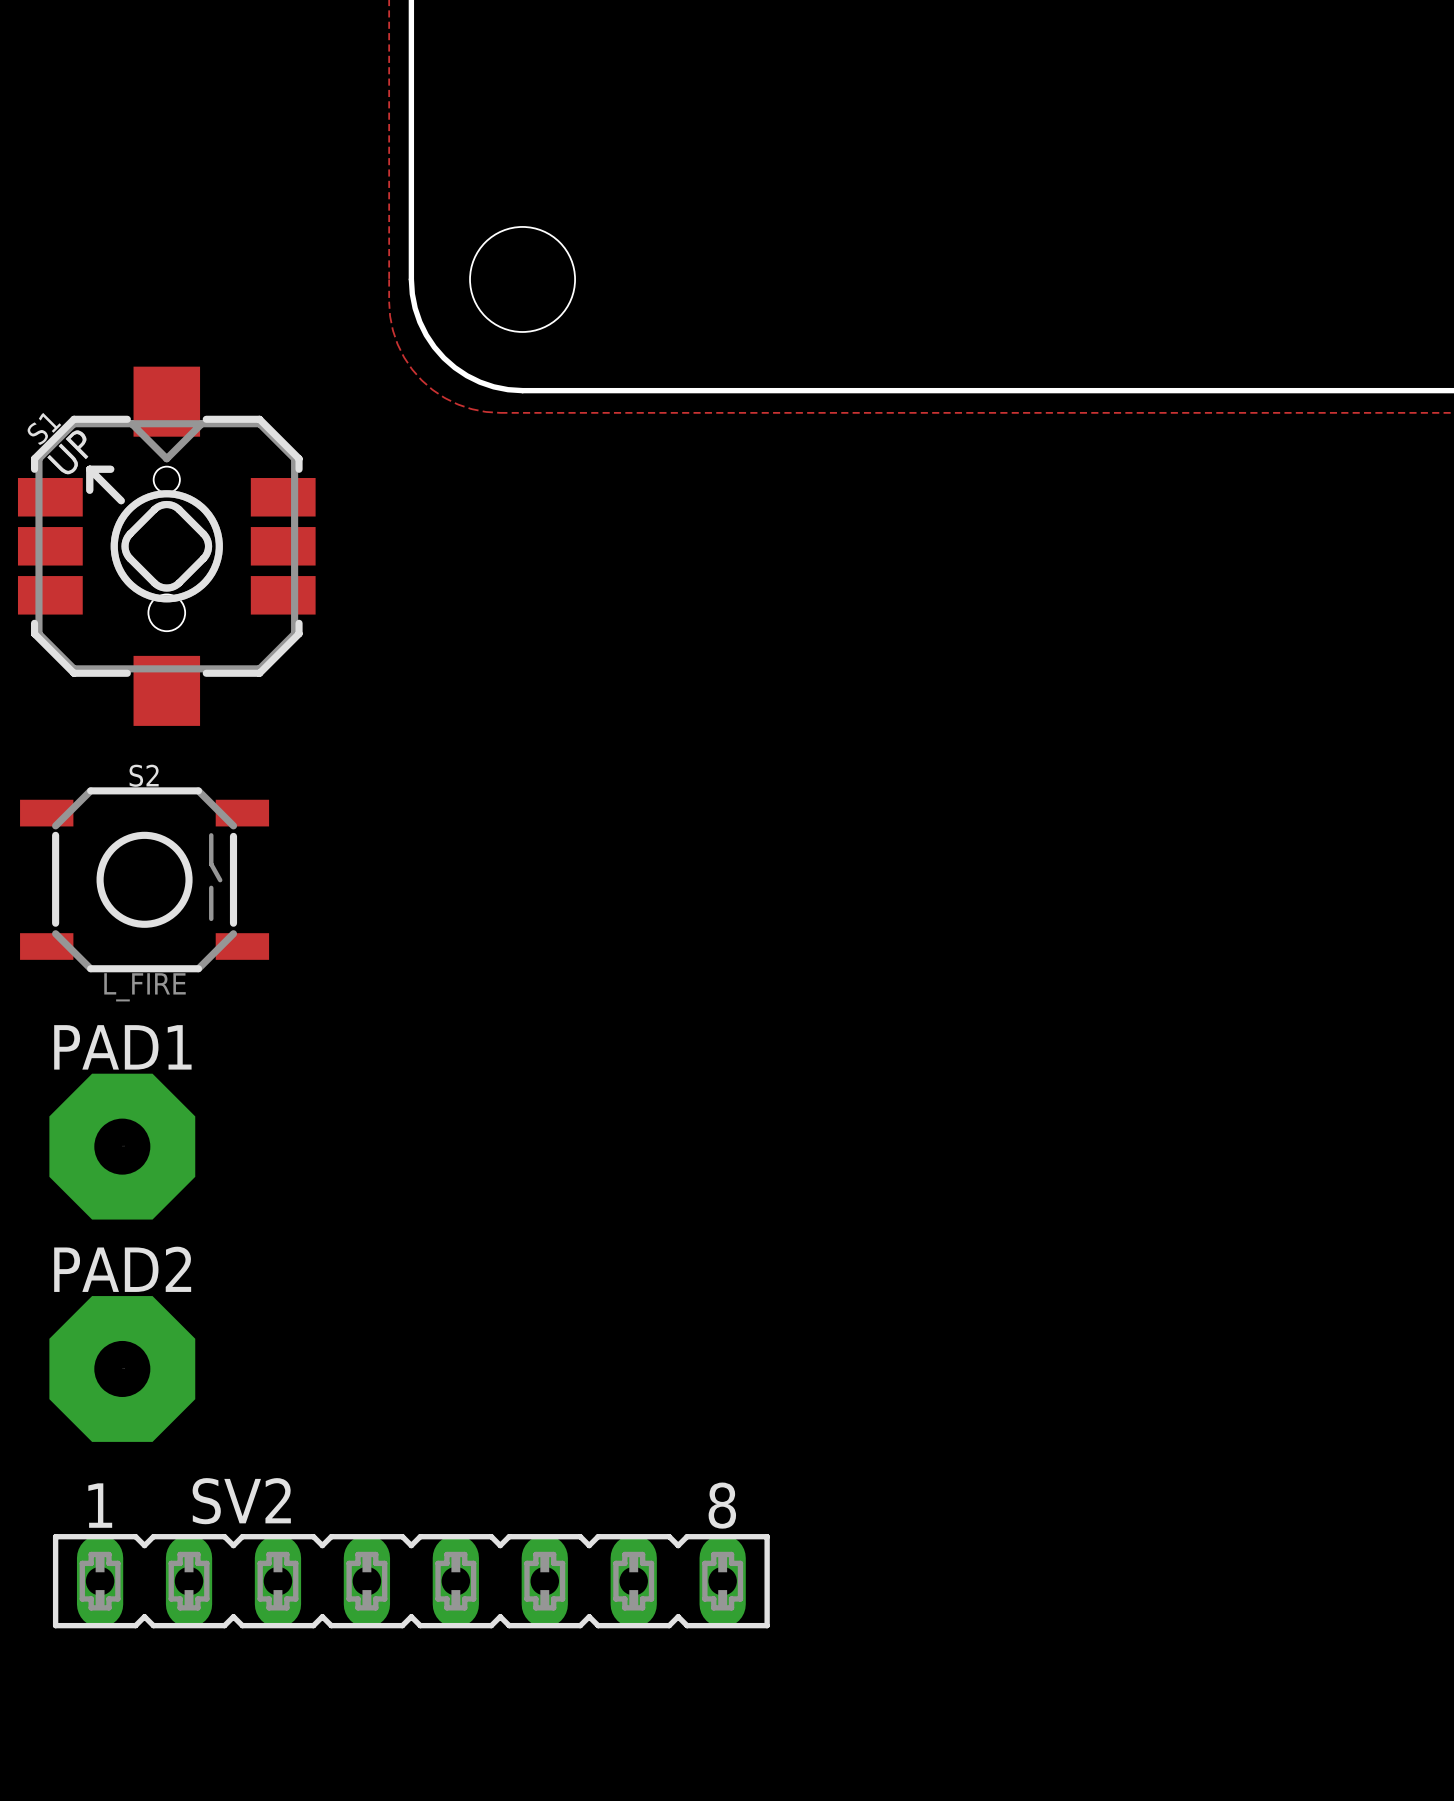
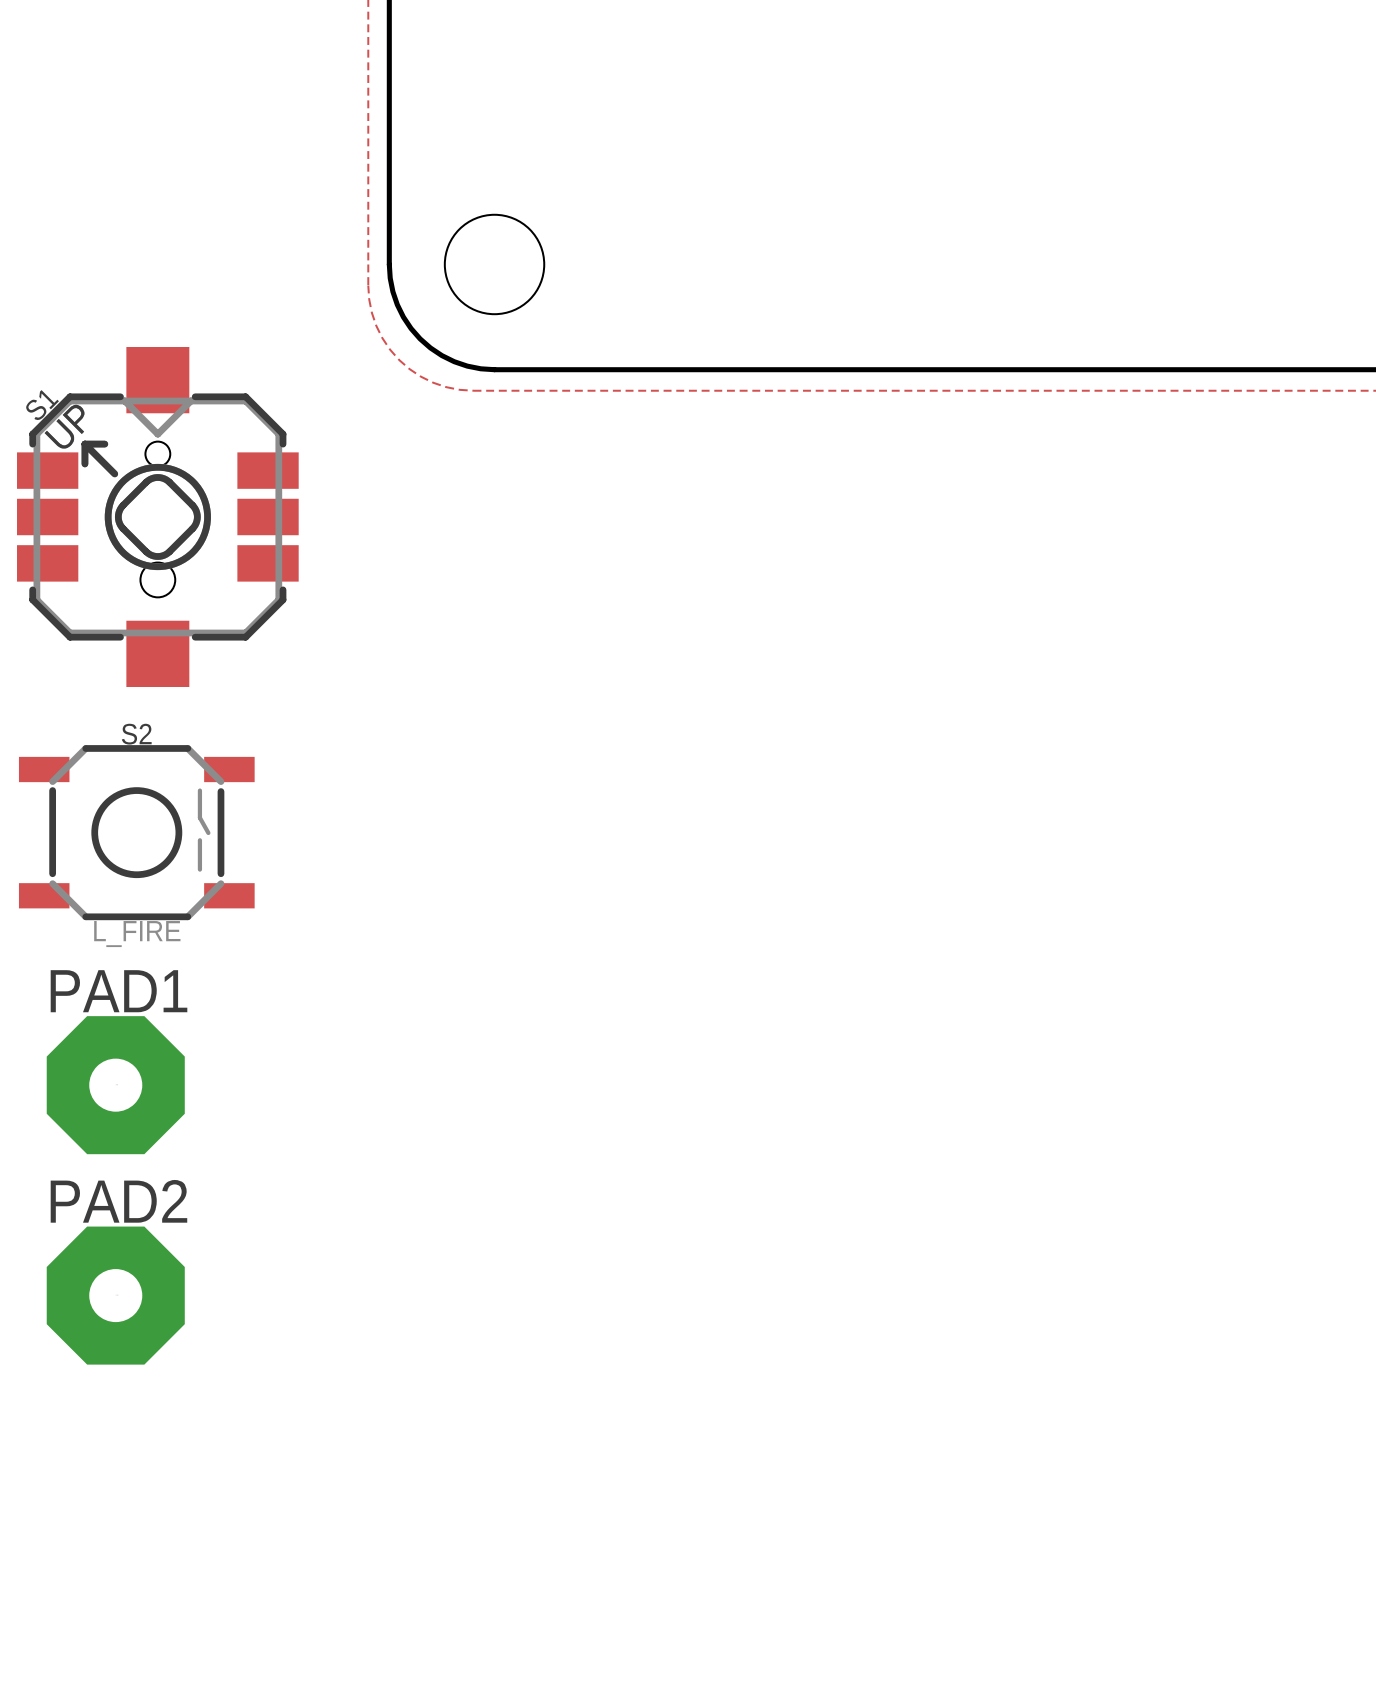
SV2: (411, 1581) -> none

